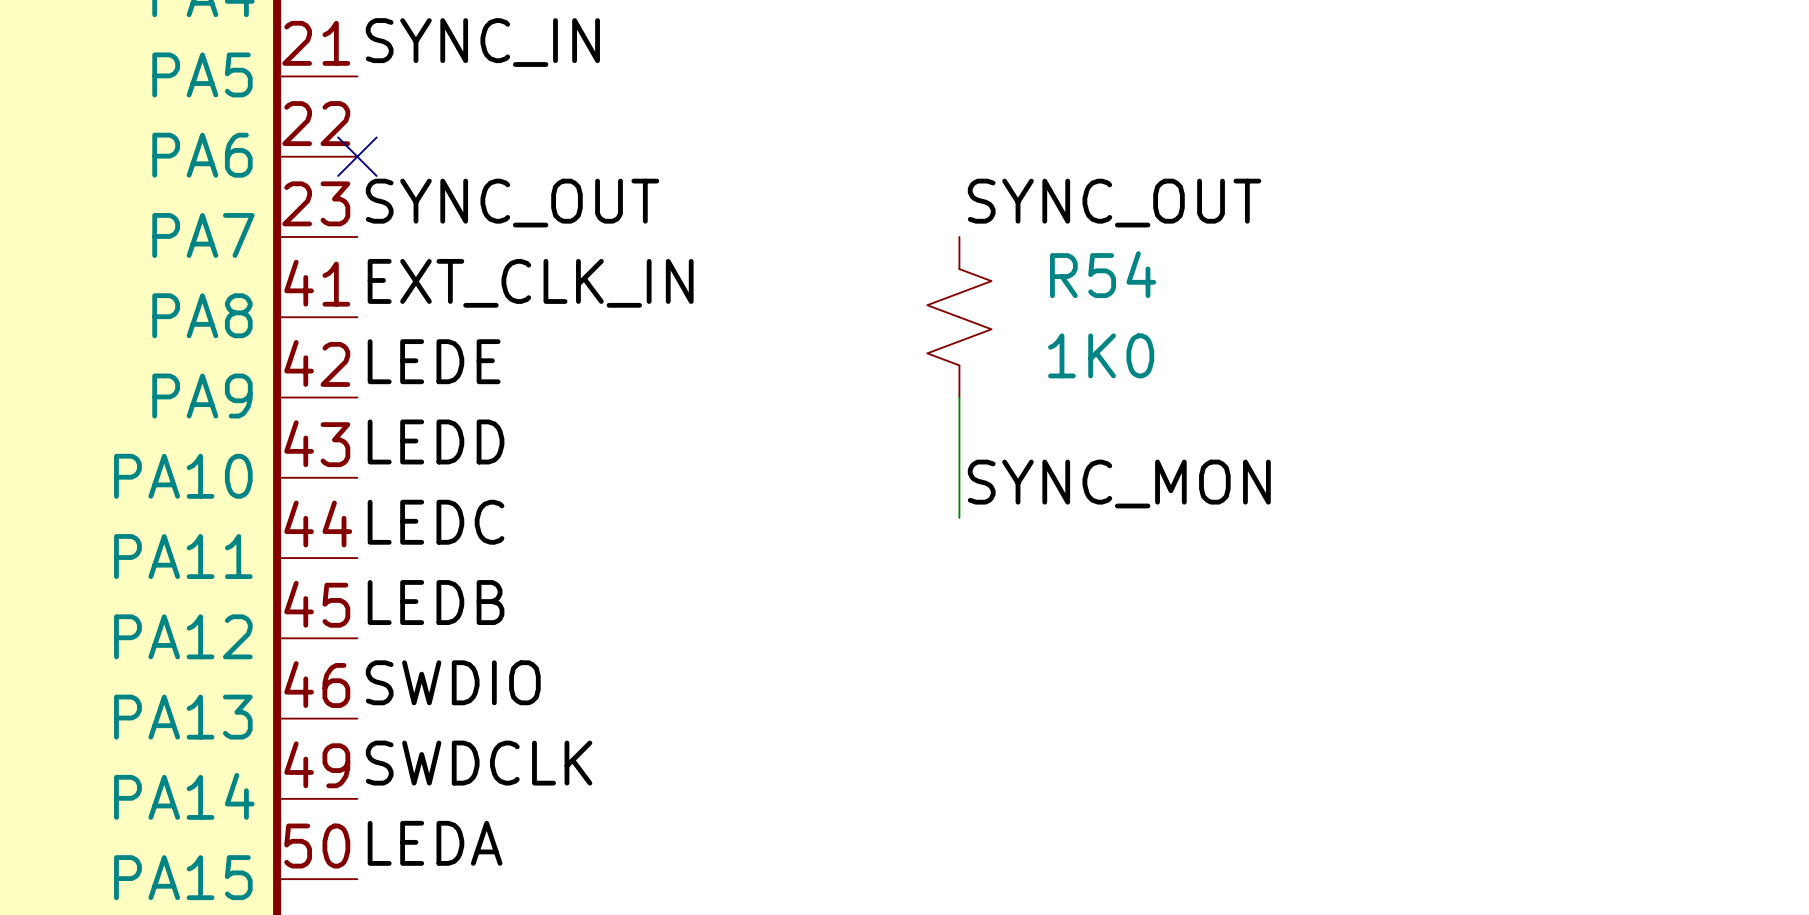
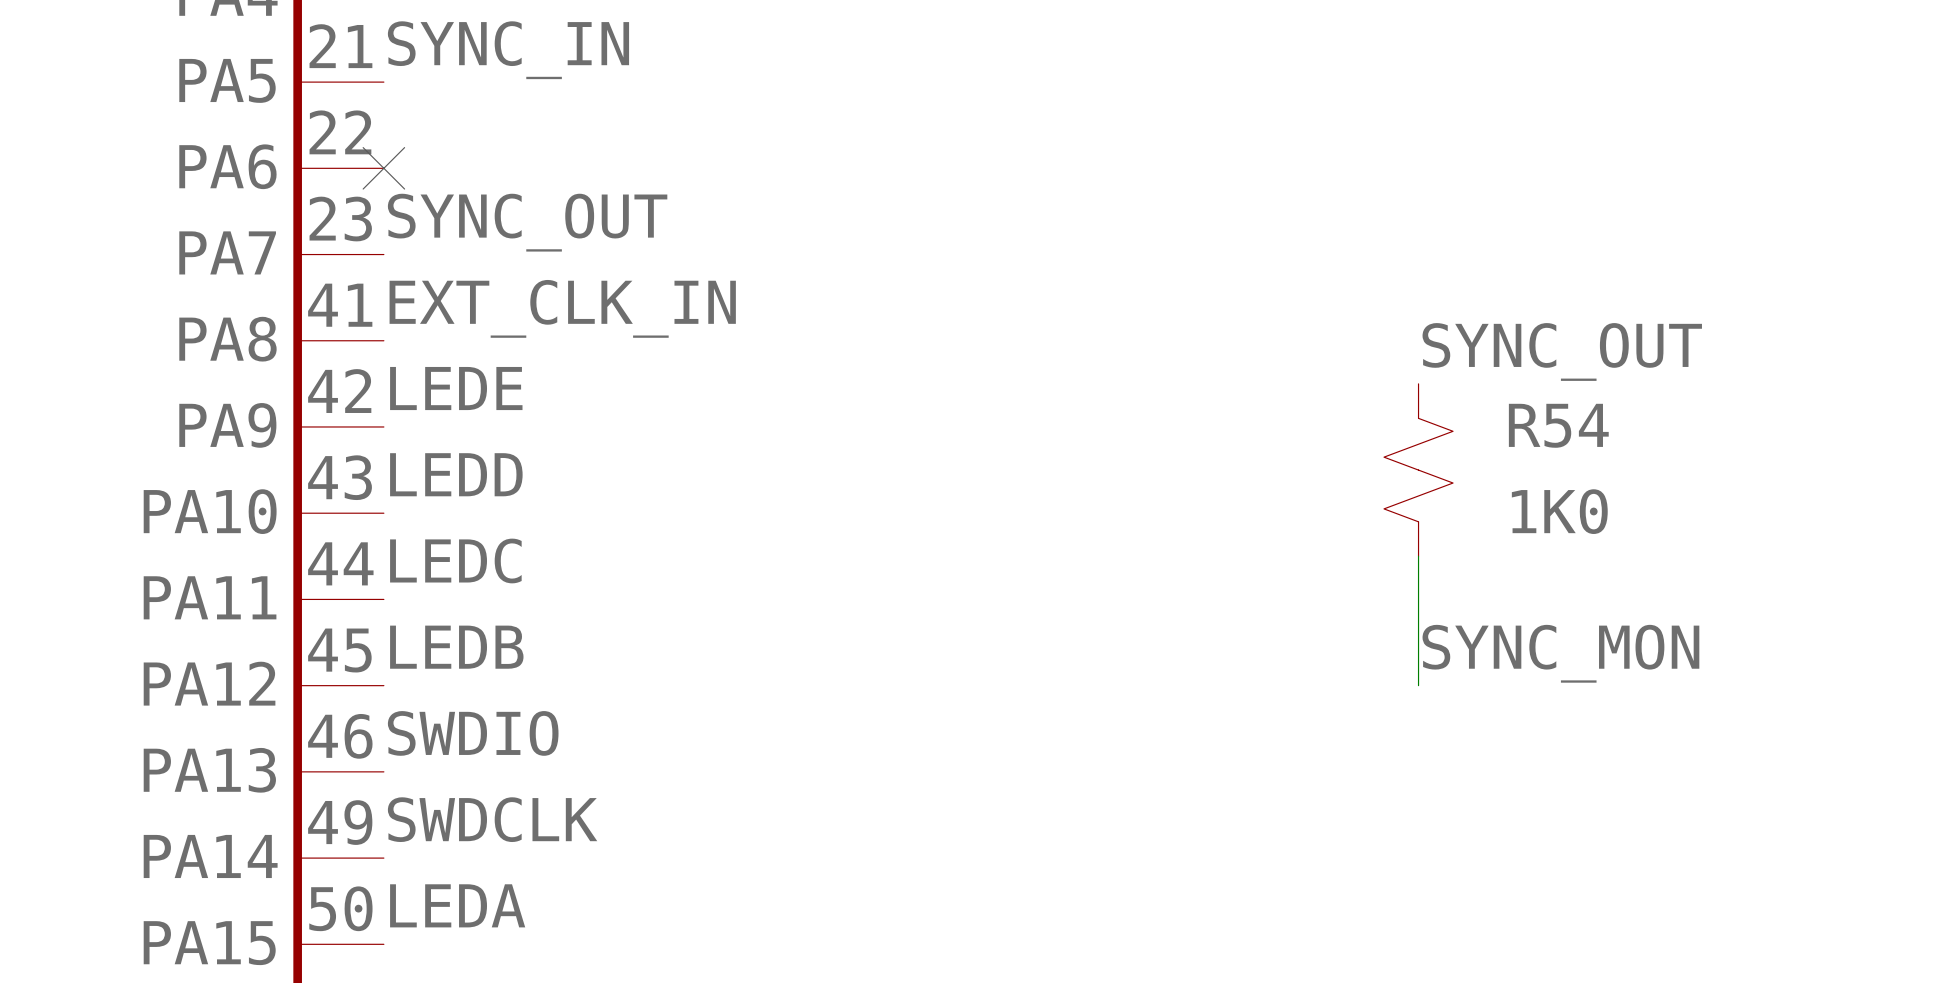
label position: SYNC_OUT (1114, 203) -> SYNC_OUT (1562, 351)
R54 position: (959, 317) -> (1418, 470)
wire: (959, 397) (959, 517) -> (1418, 556) (1418, 685)
label position: SYNC_MON (1119, 484) -> SYNC_MON (1560, 653)

